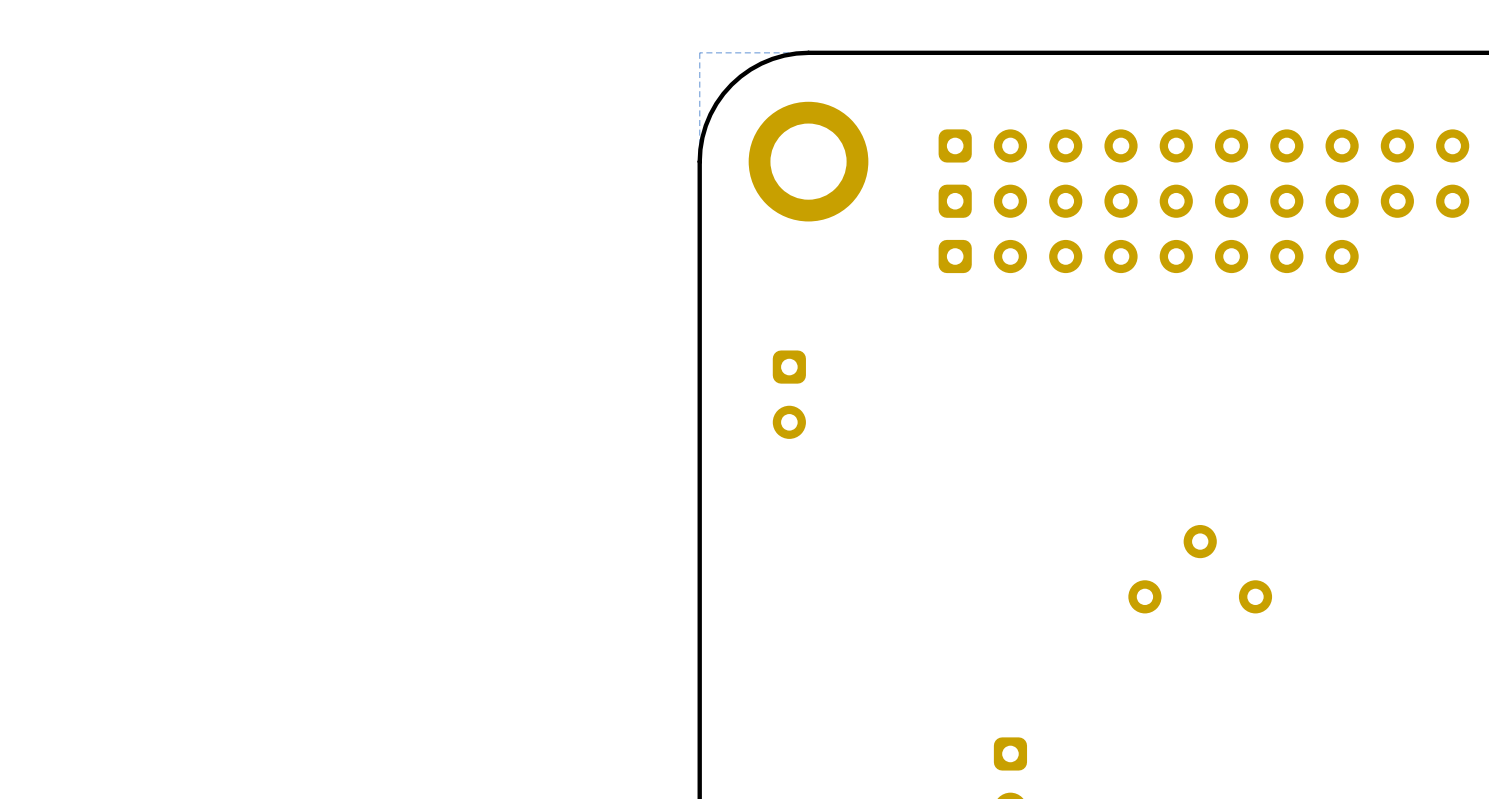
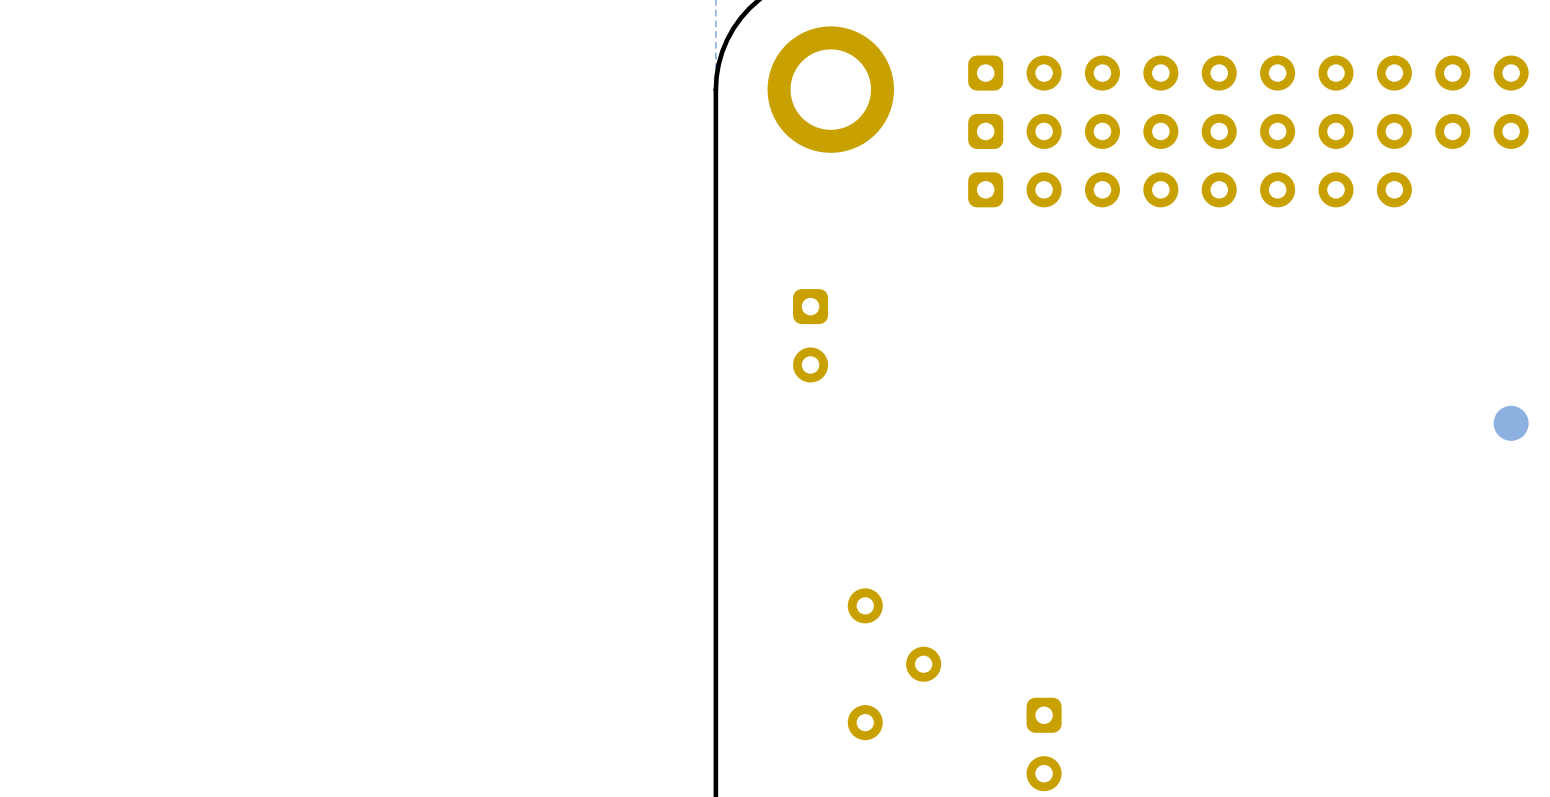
part: none -> (1511, 423)
part rotation: 0° (1200, 569) -> 90° clockwise (894, 664)
part position: (1200, 569) -> (894, 664)

